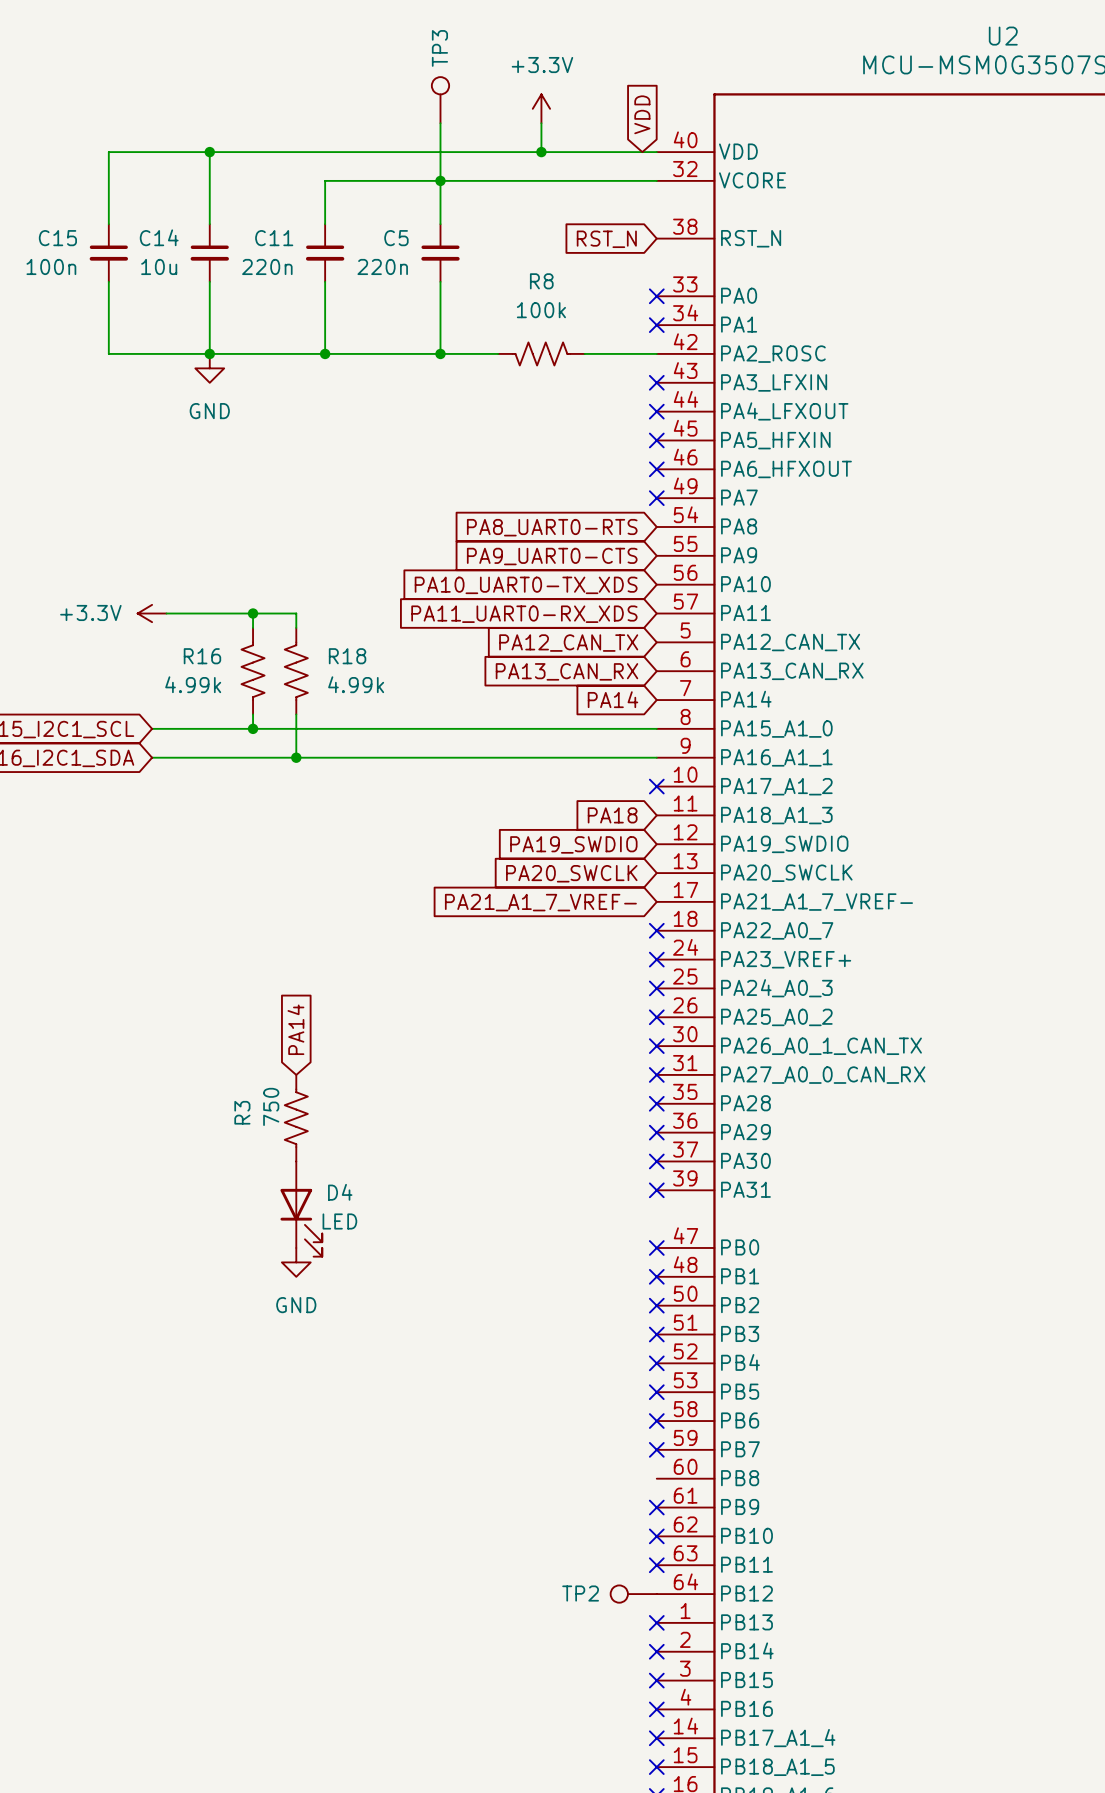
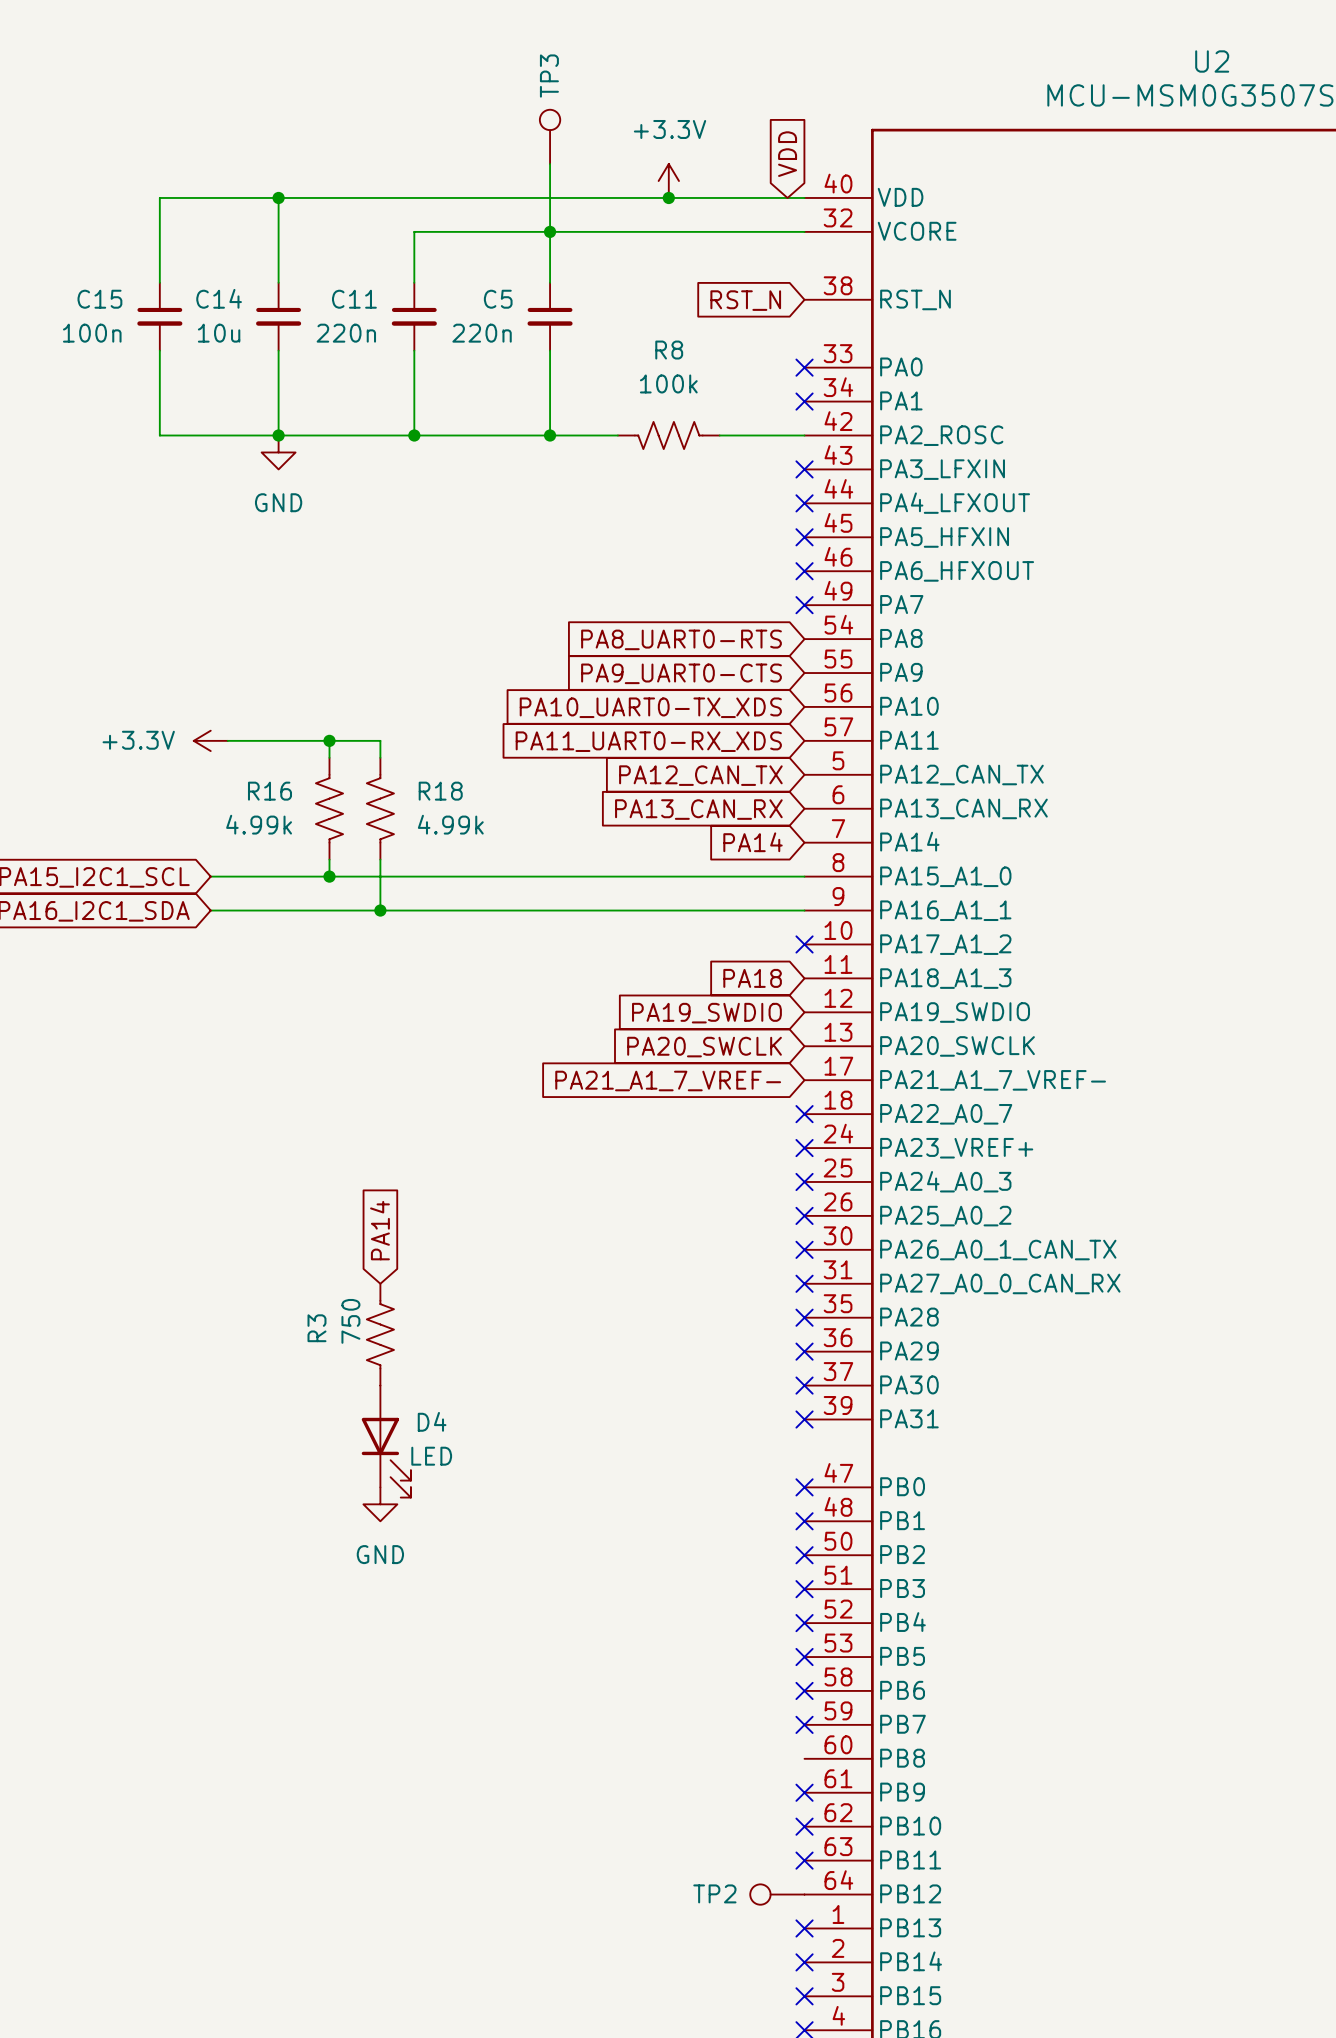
power symbol position: +3.3V (541, 108) -> +3.3V (668, 181)

